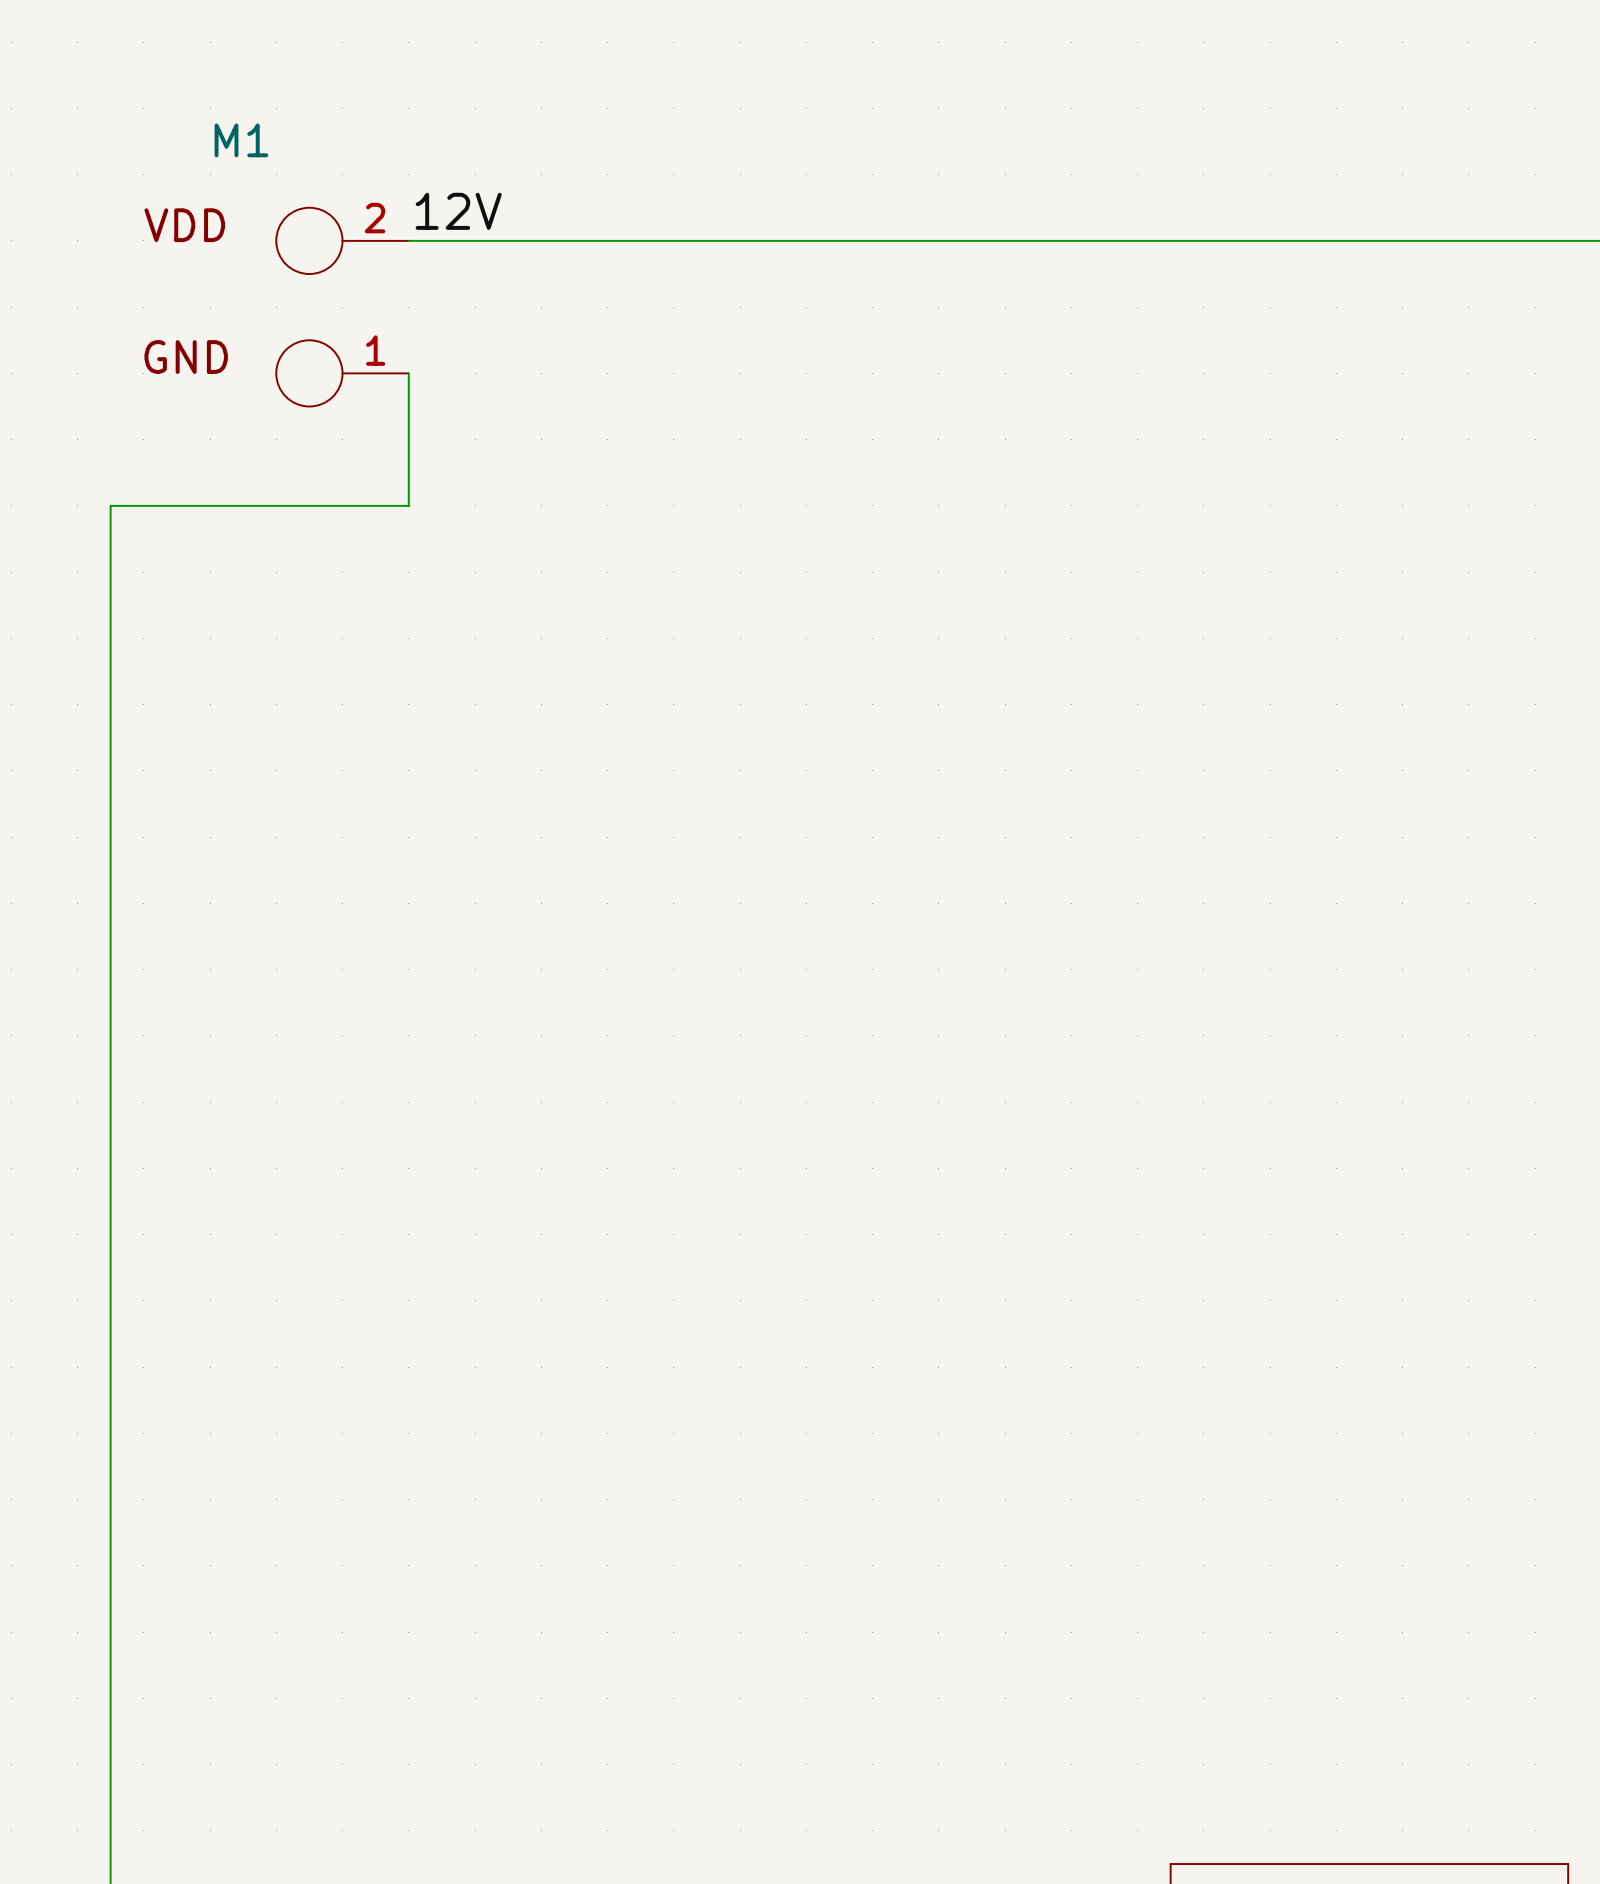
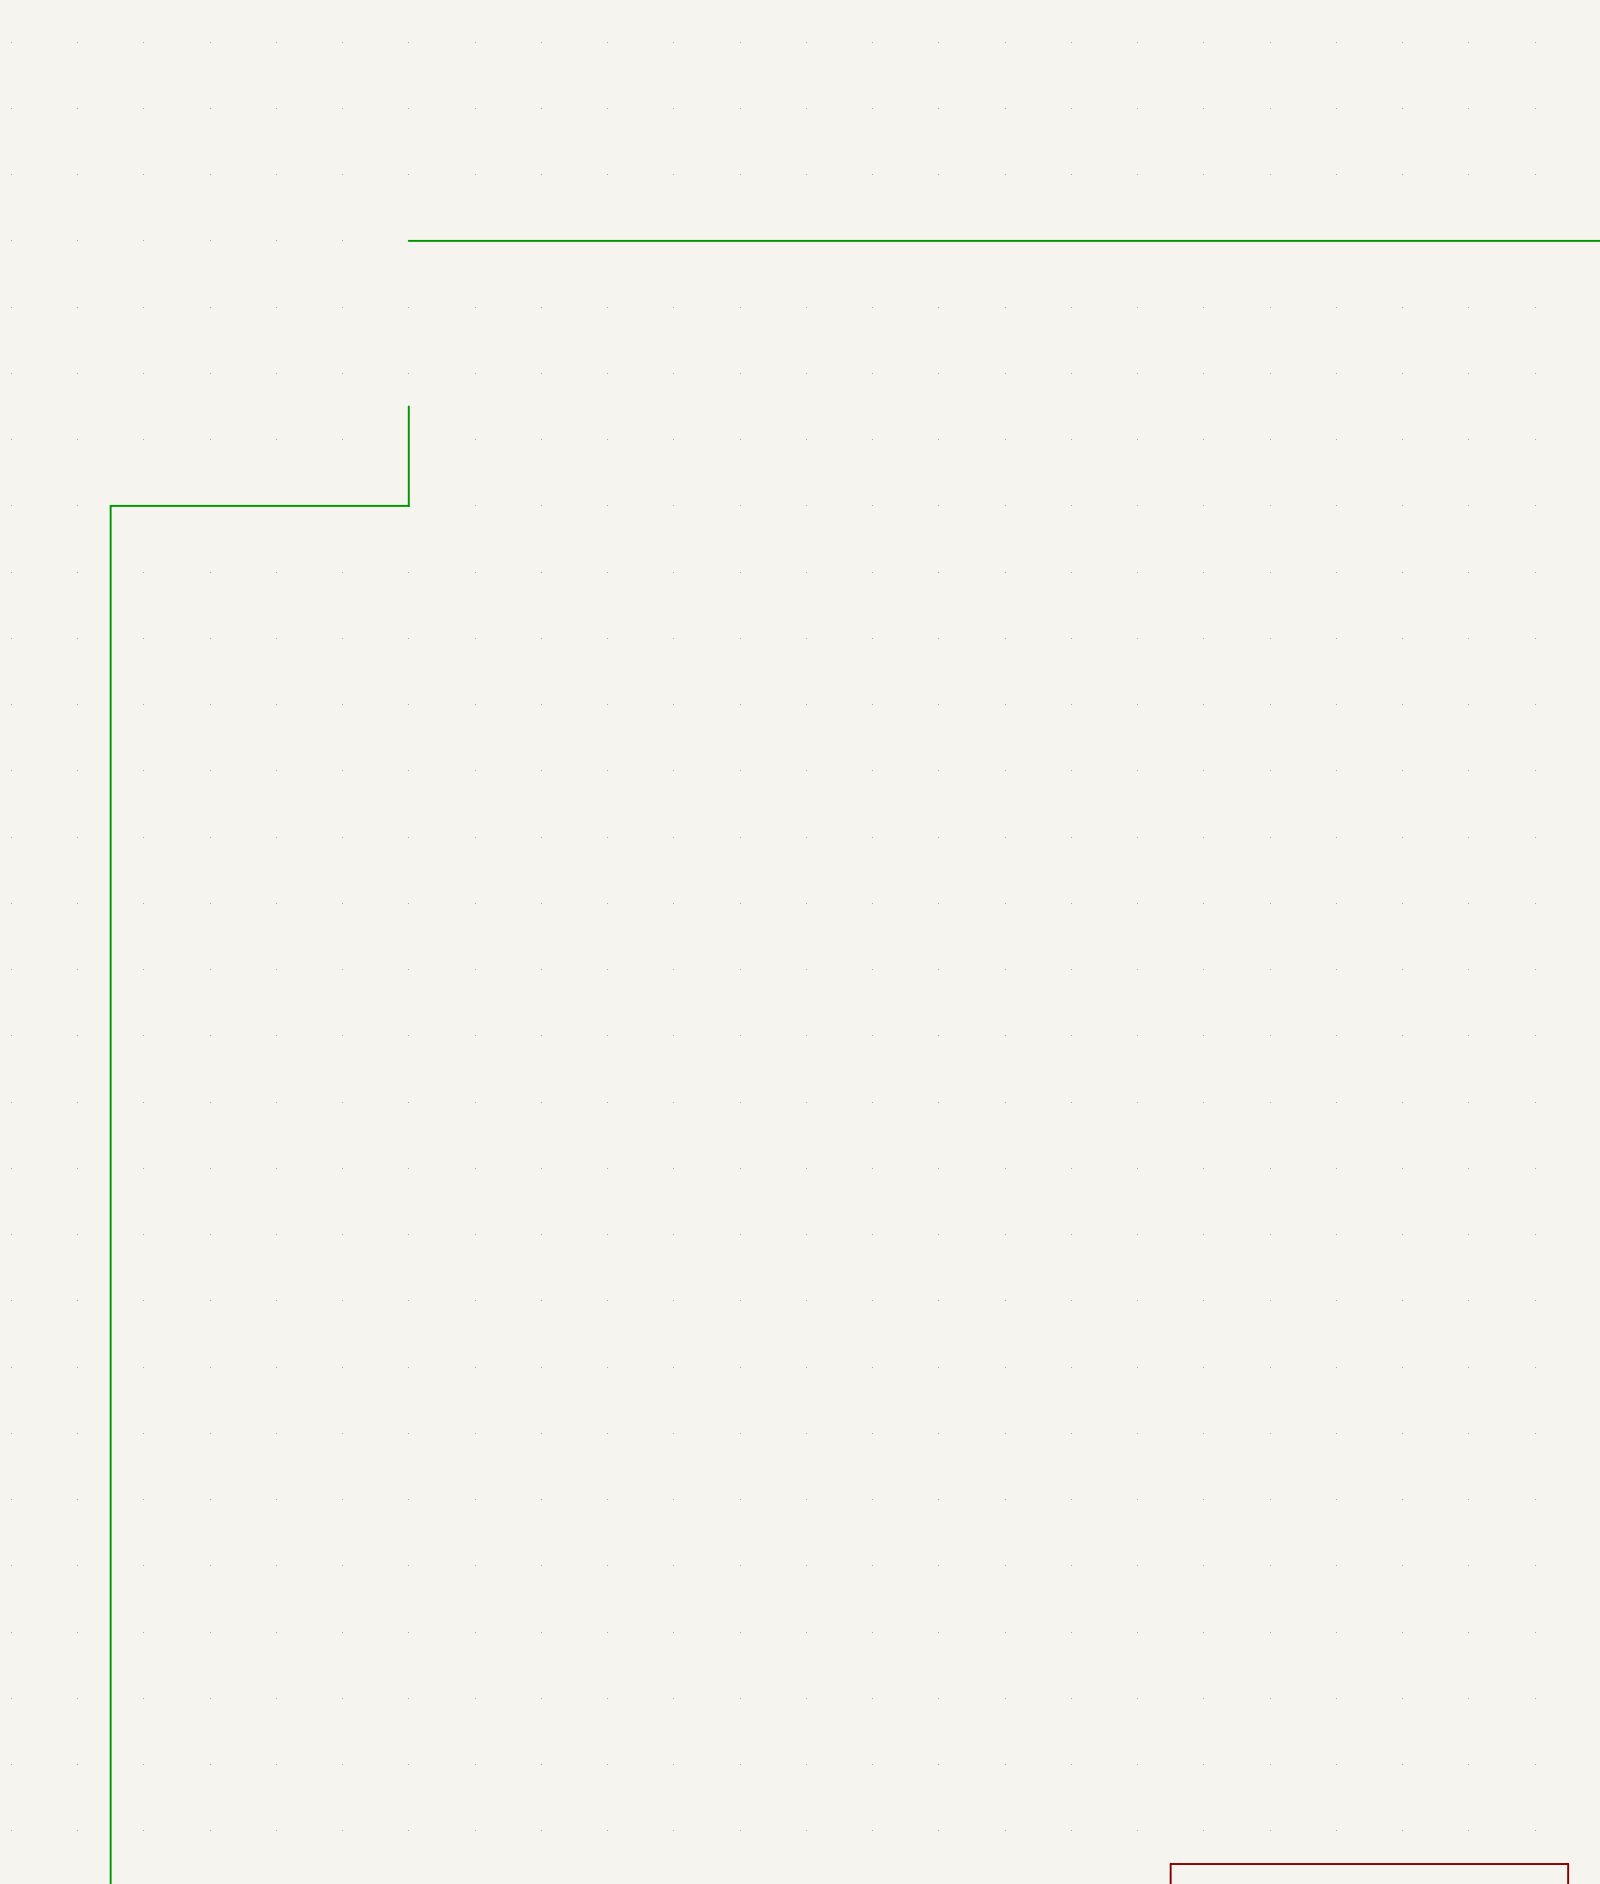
label: 12V (458, 211) -> none
M1: (342, 307) -> none
wire: (408, 373) (408, 406) -> none

